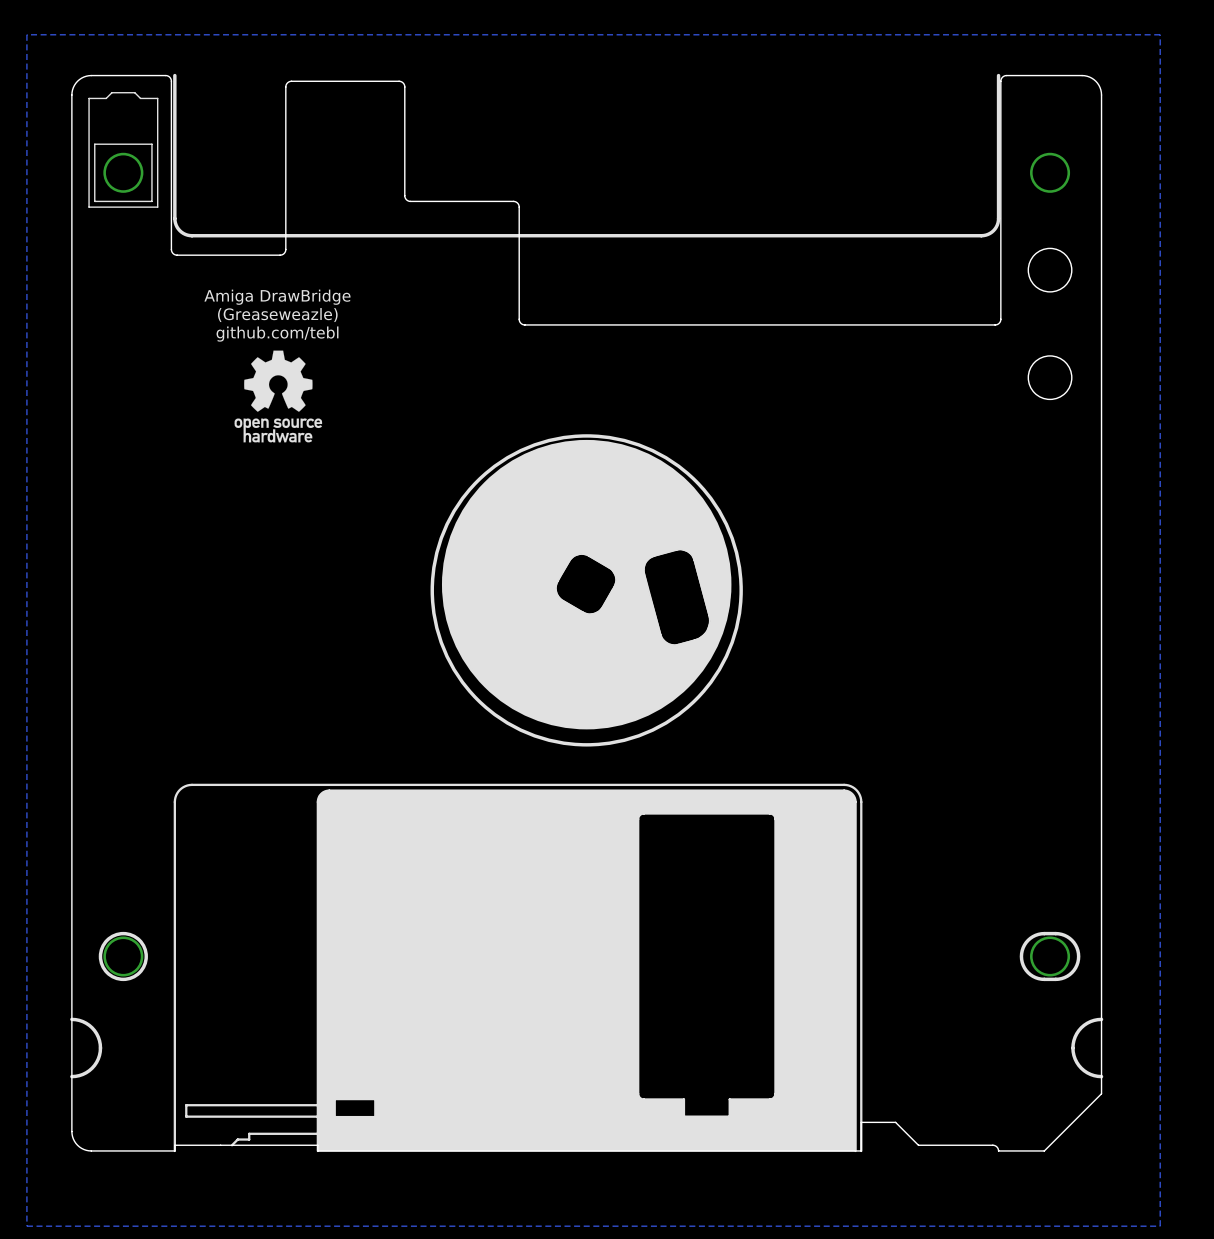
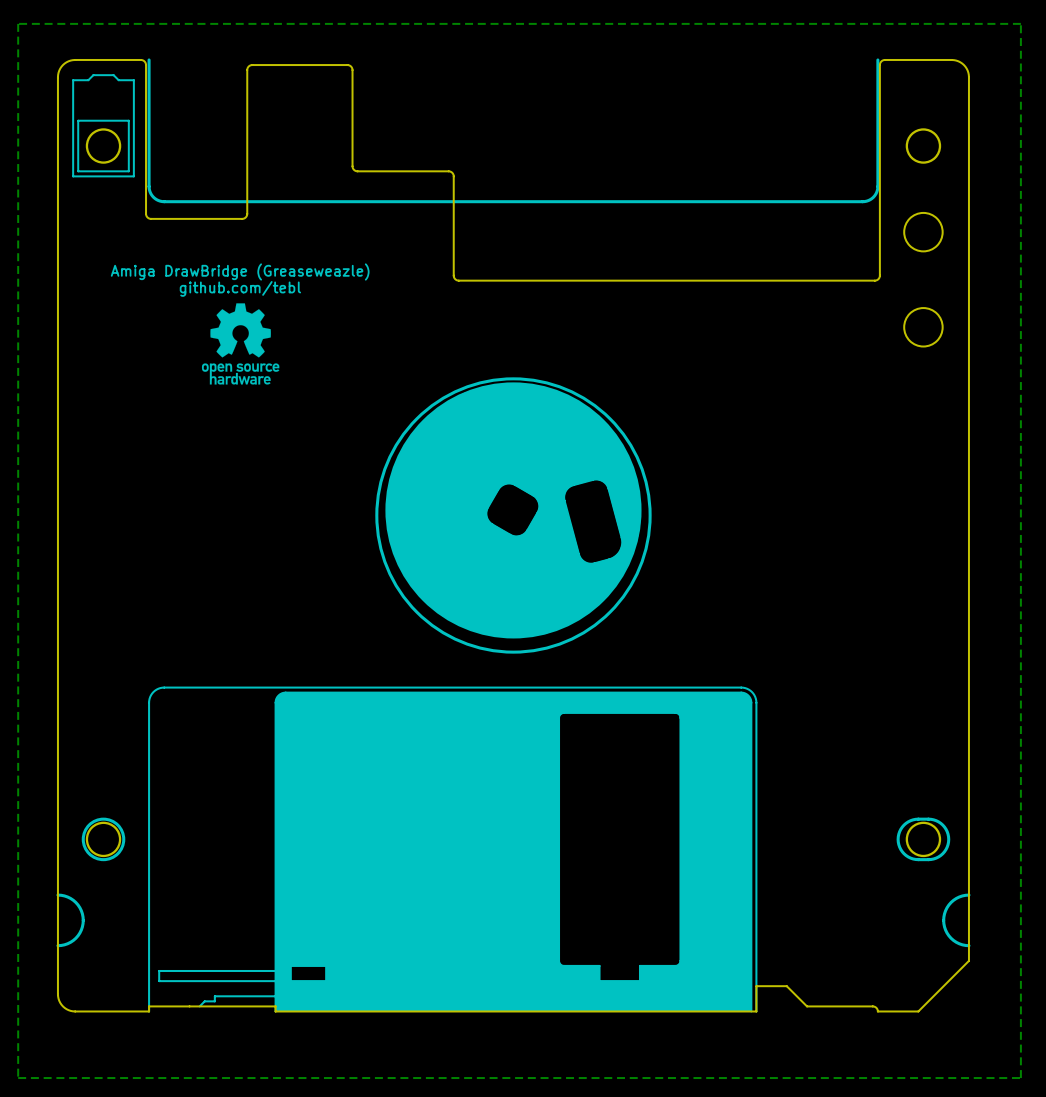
text: Amiga DrawBridge (277, 297) -> none
text: (Greaseweazle) (277, 315) -> Amiga DrawBridge (Greaseweazle) (240, 271)

